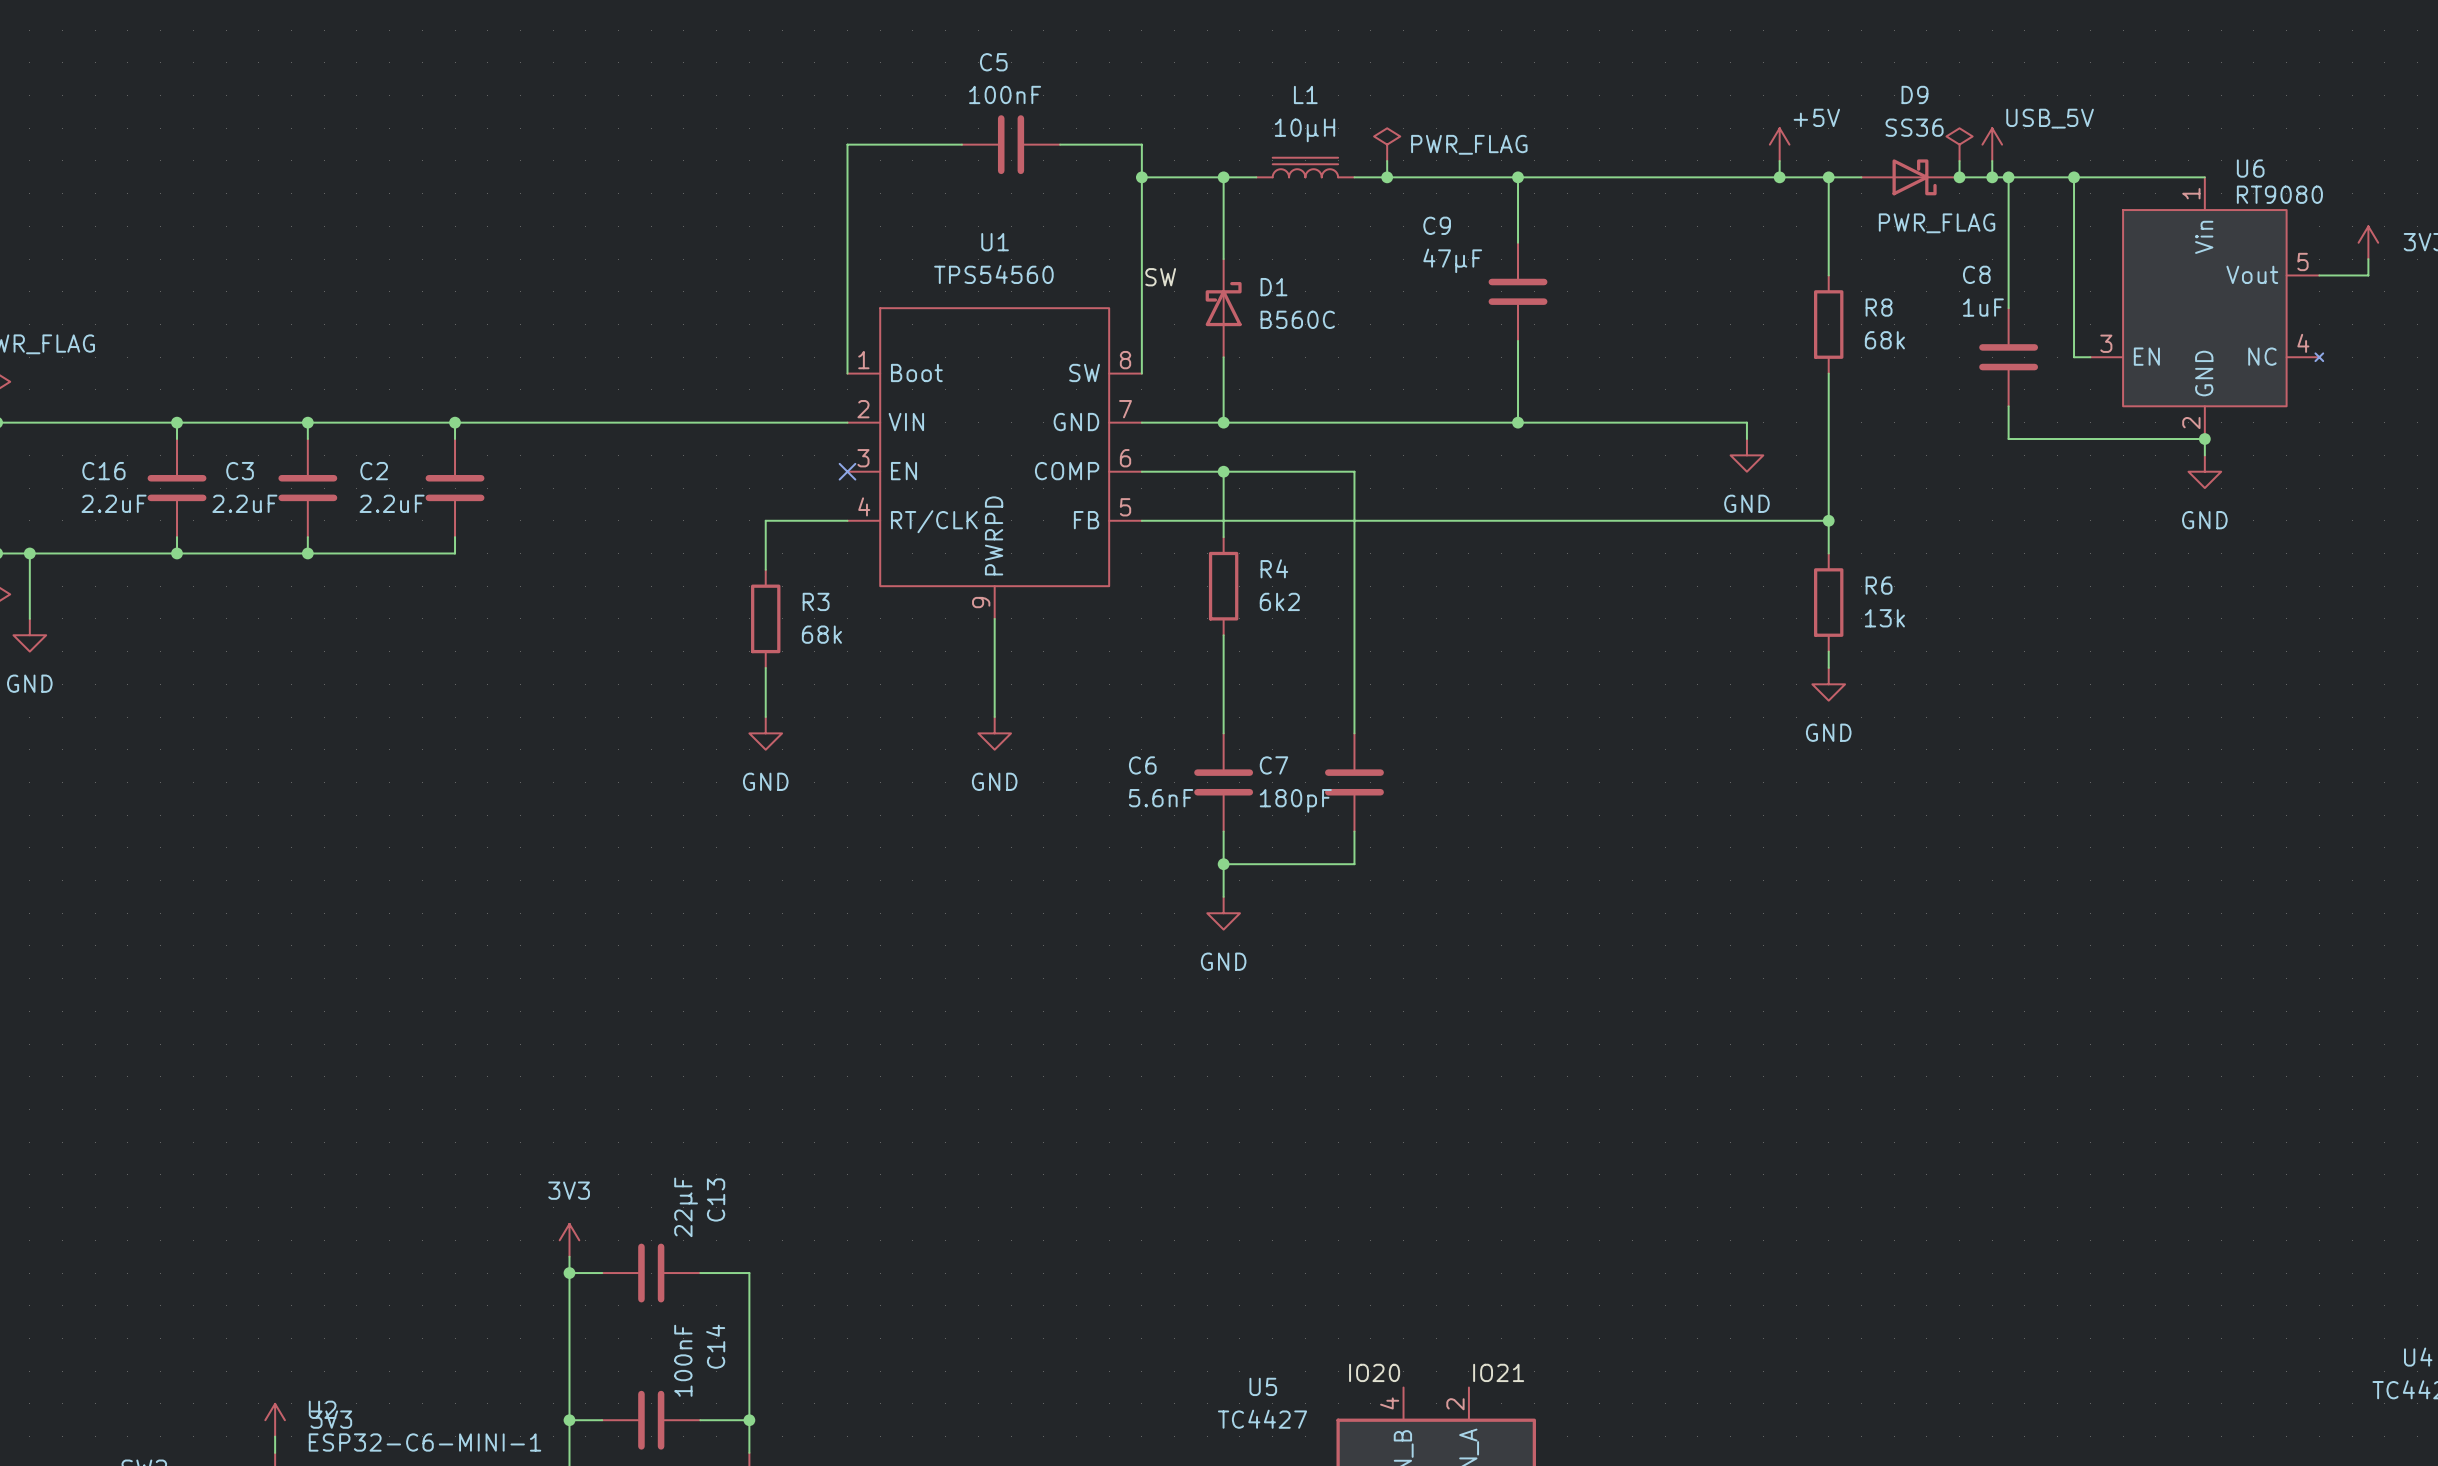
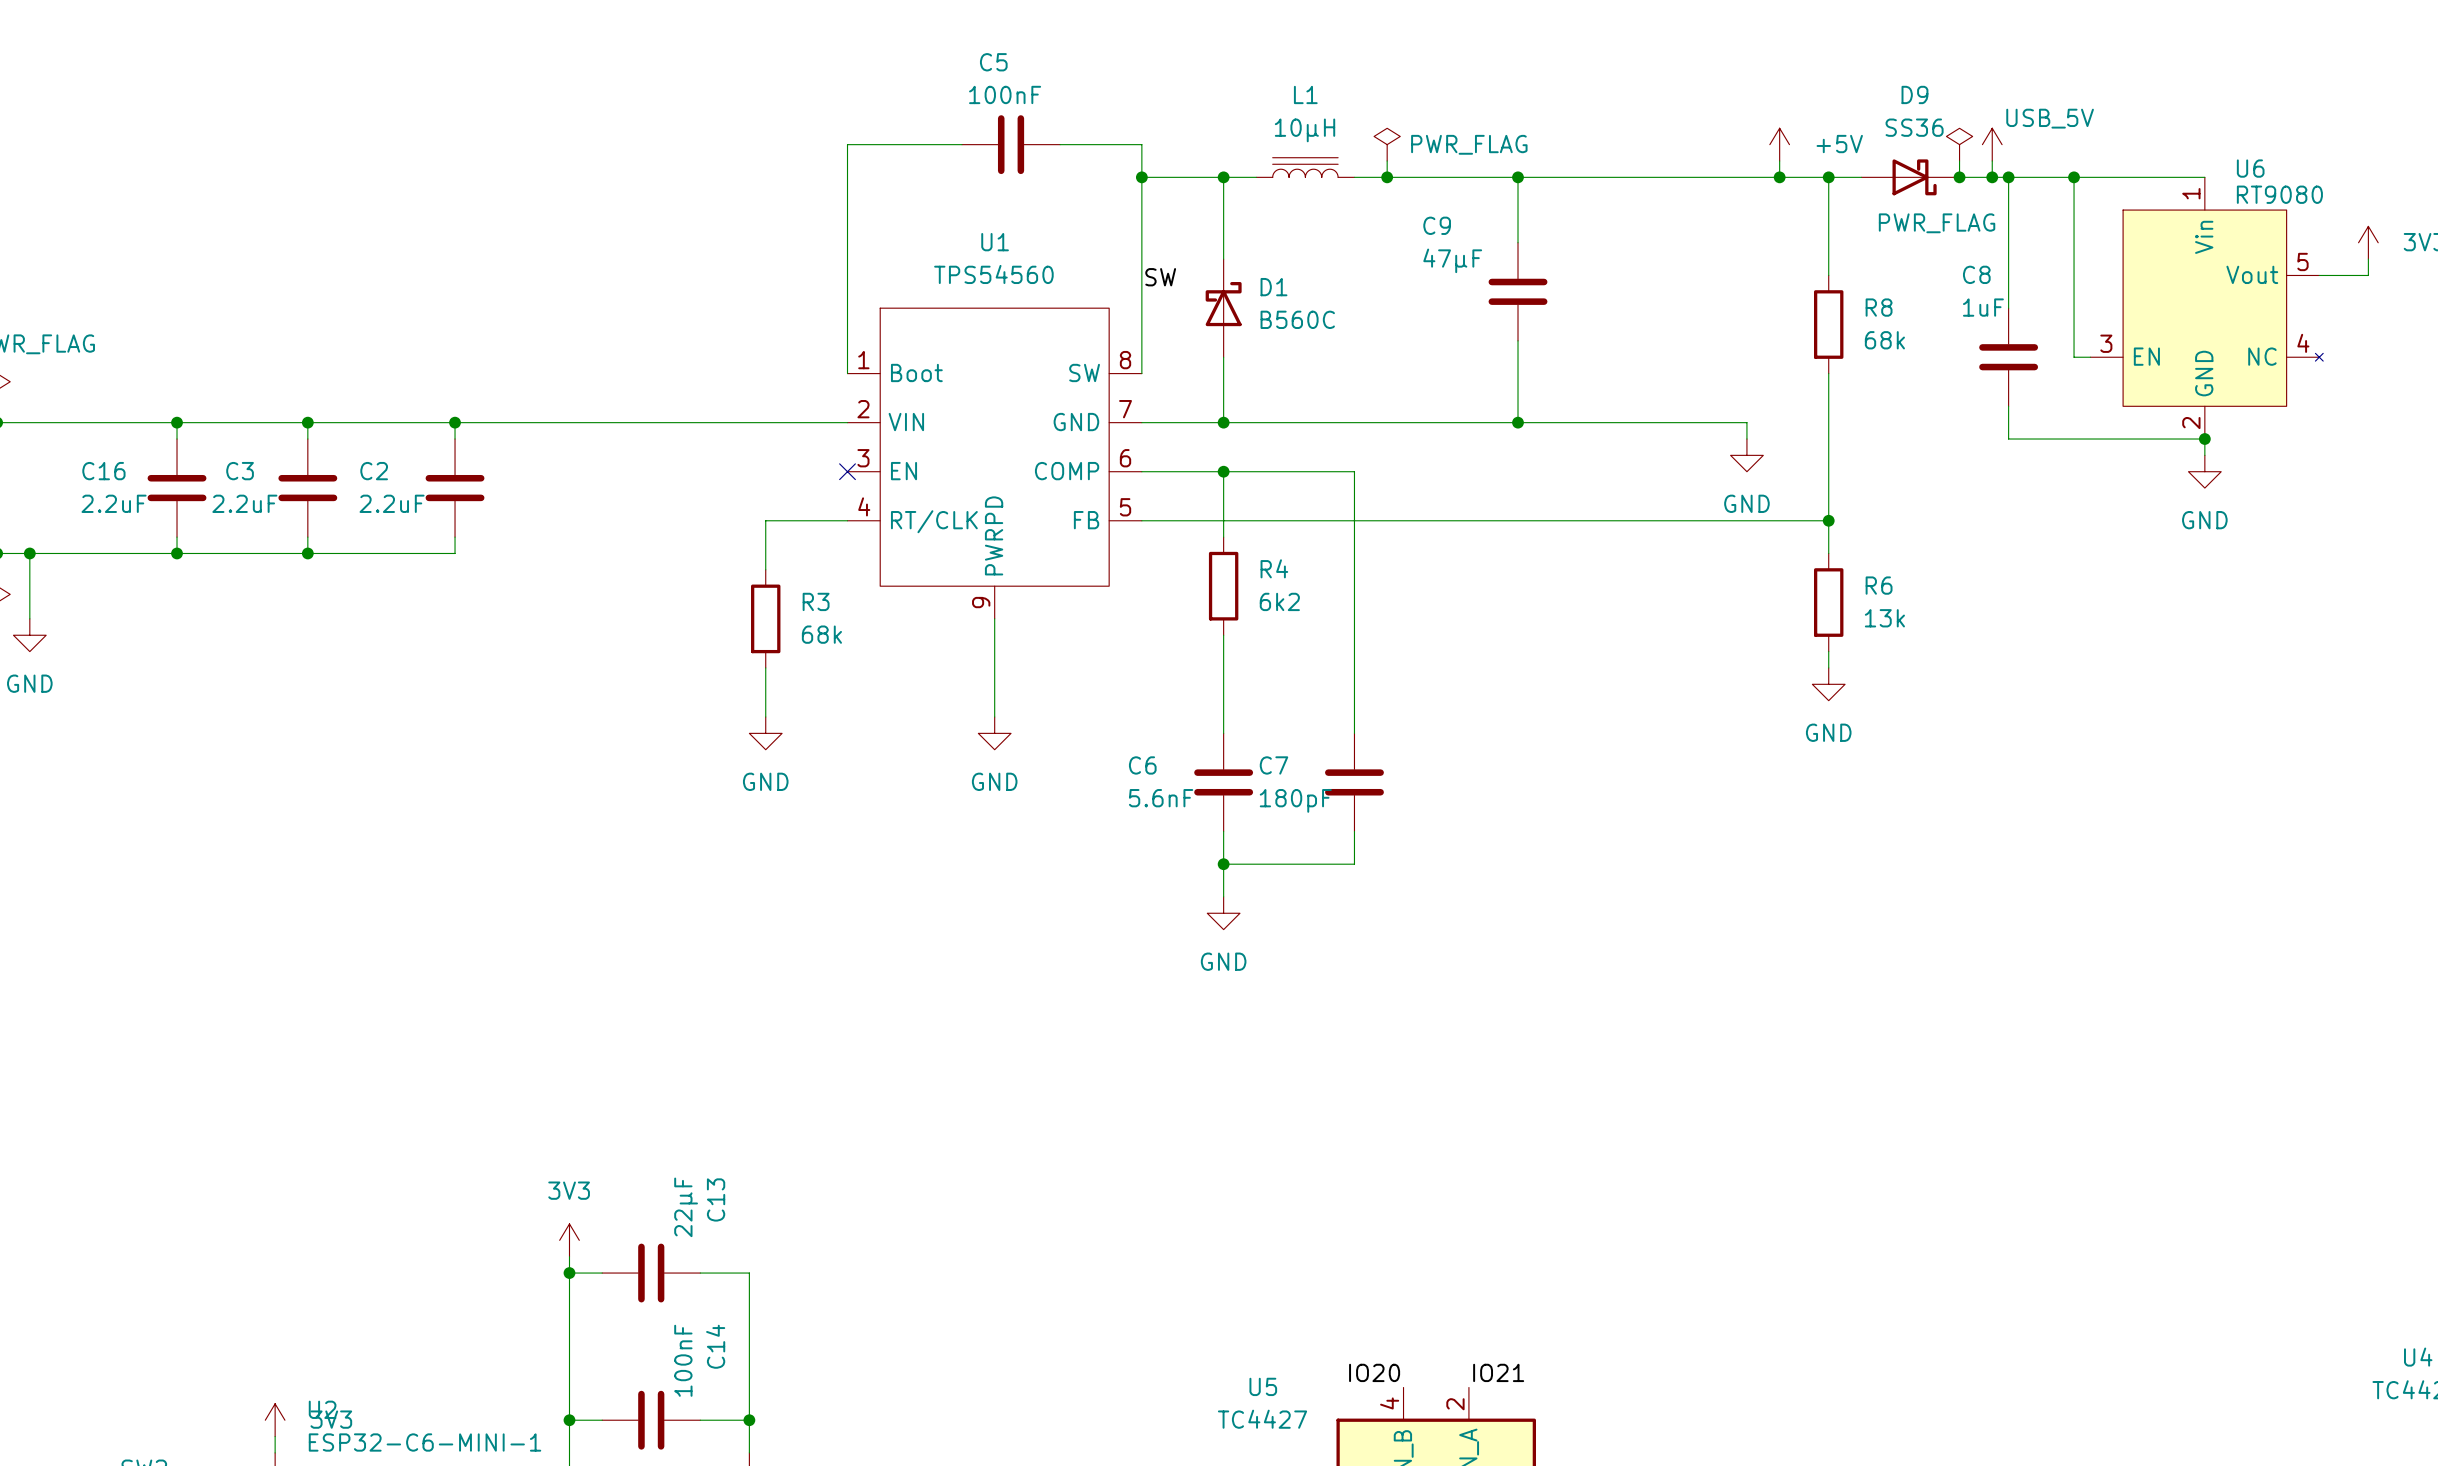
power symbol text position: +5V (1816, 117) -> +5V (1839, 144)

